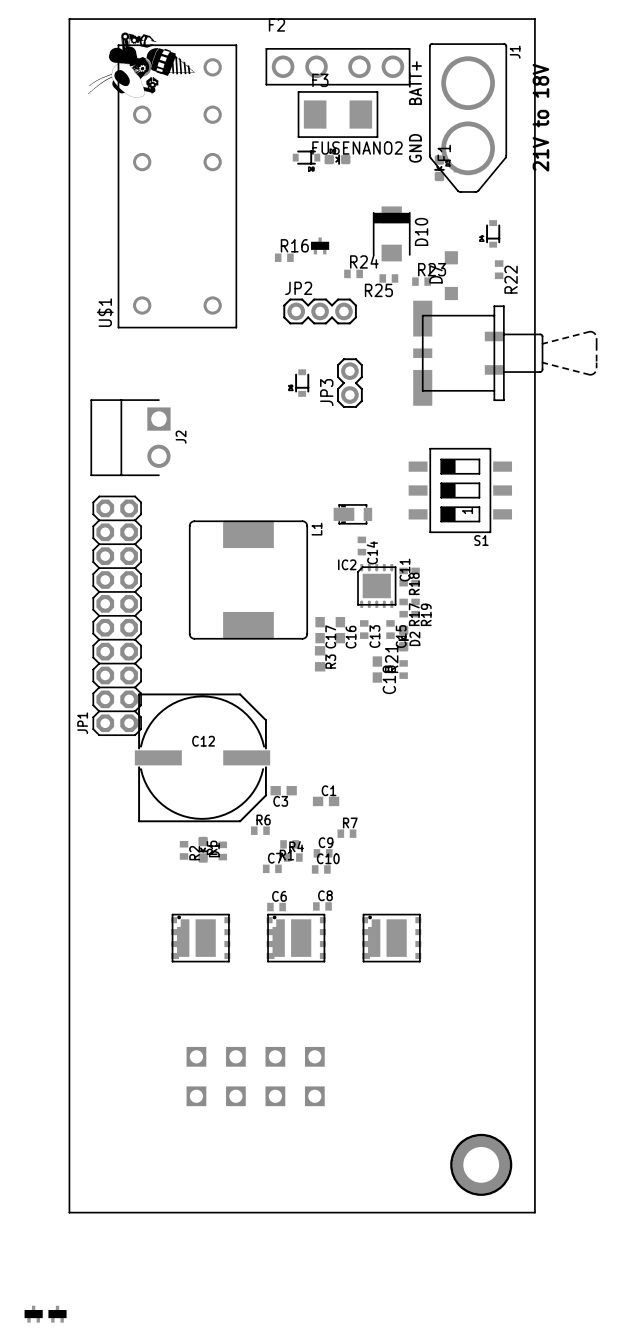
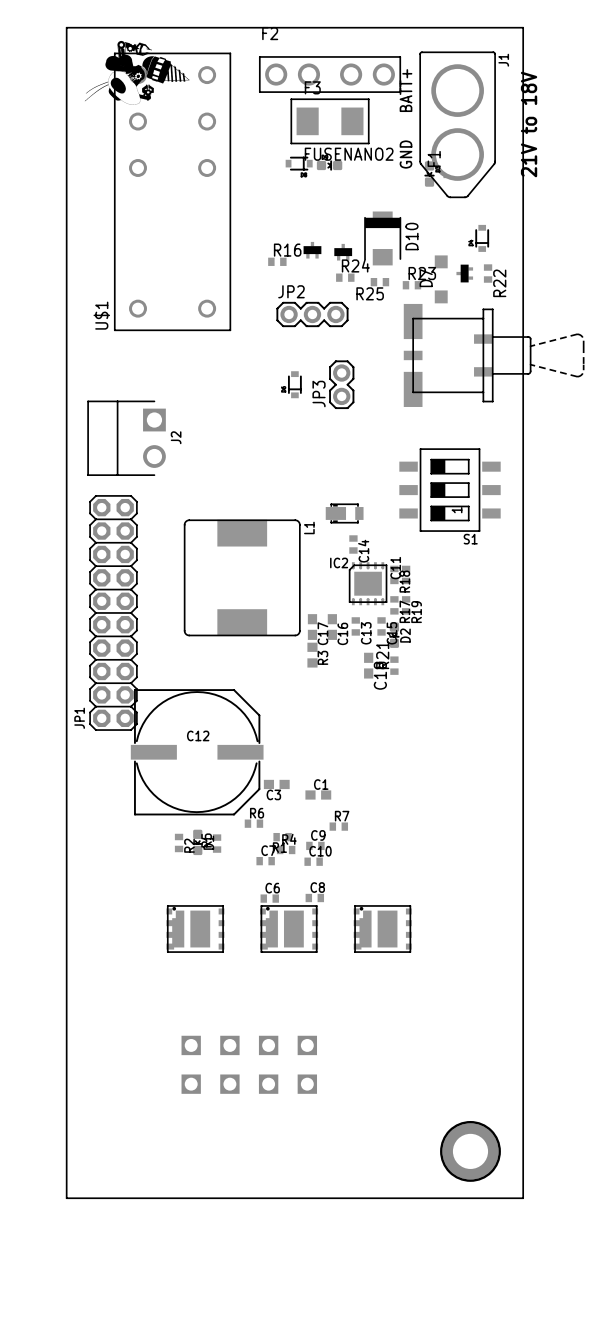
part: none -> (343, 252)
part: none -> (464, 273)
part: (33, 1314) -> none
part: (57, 1314) -> none

